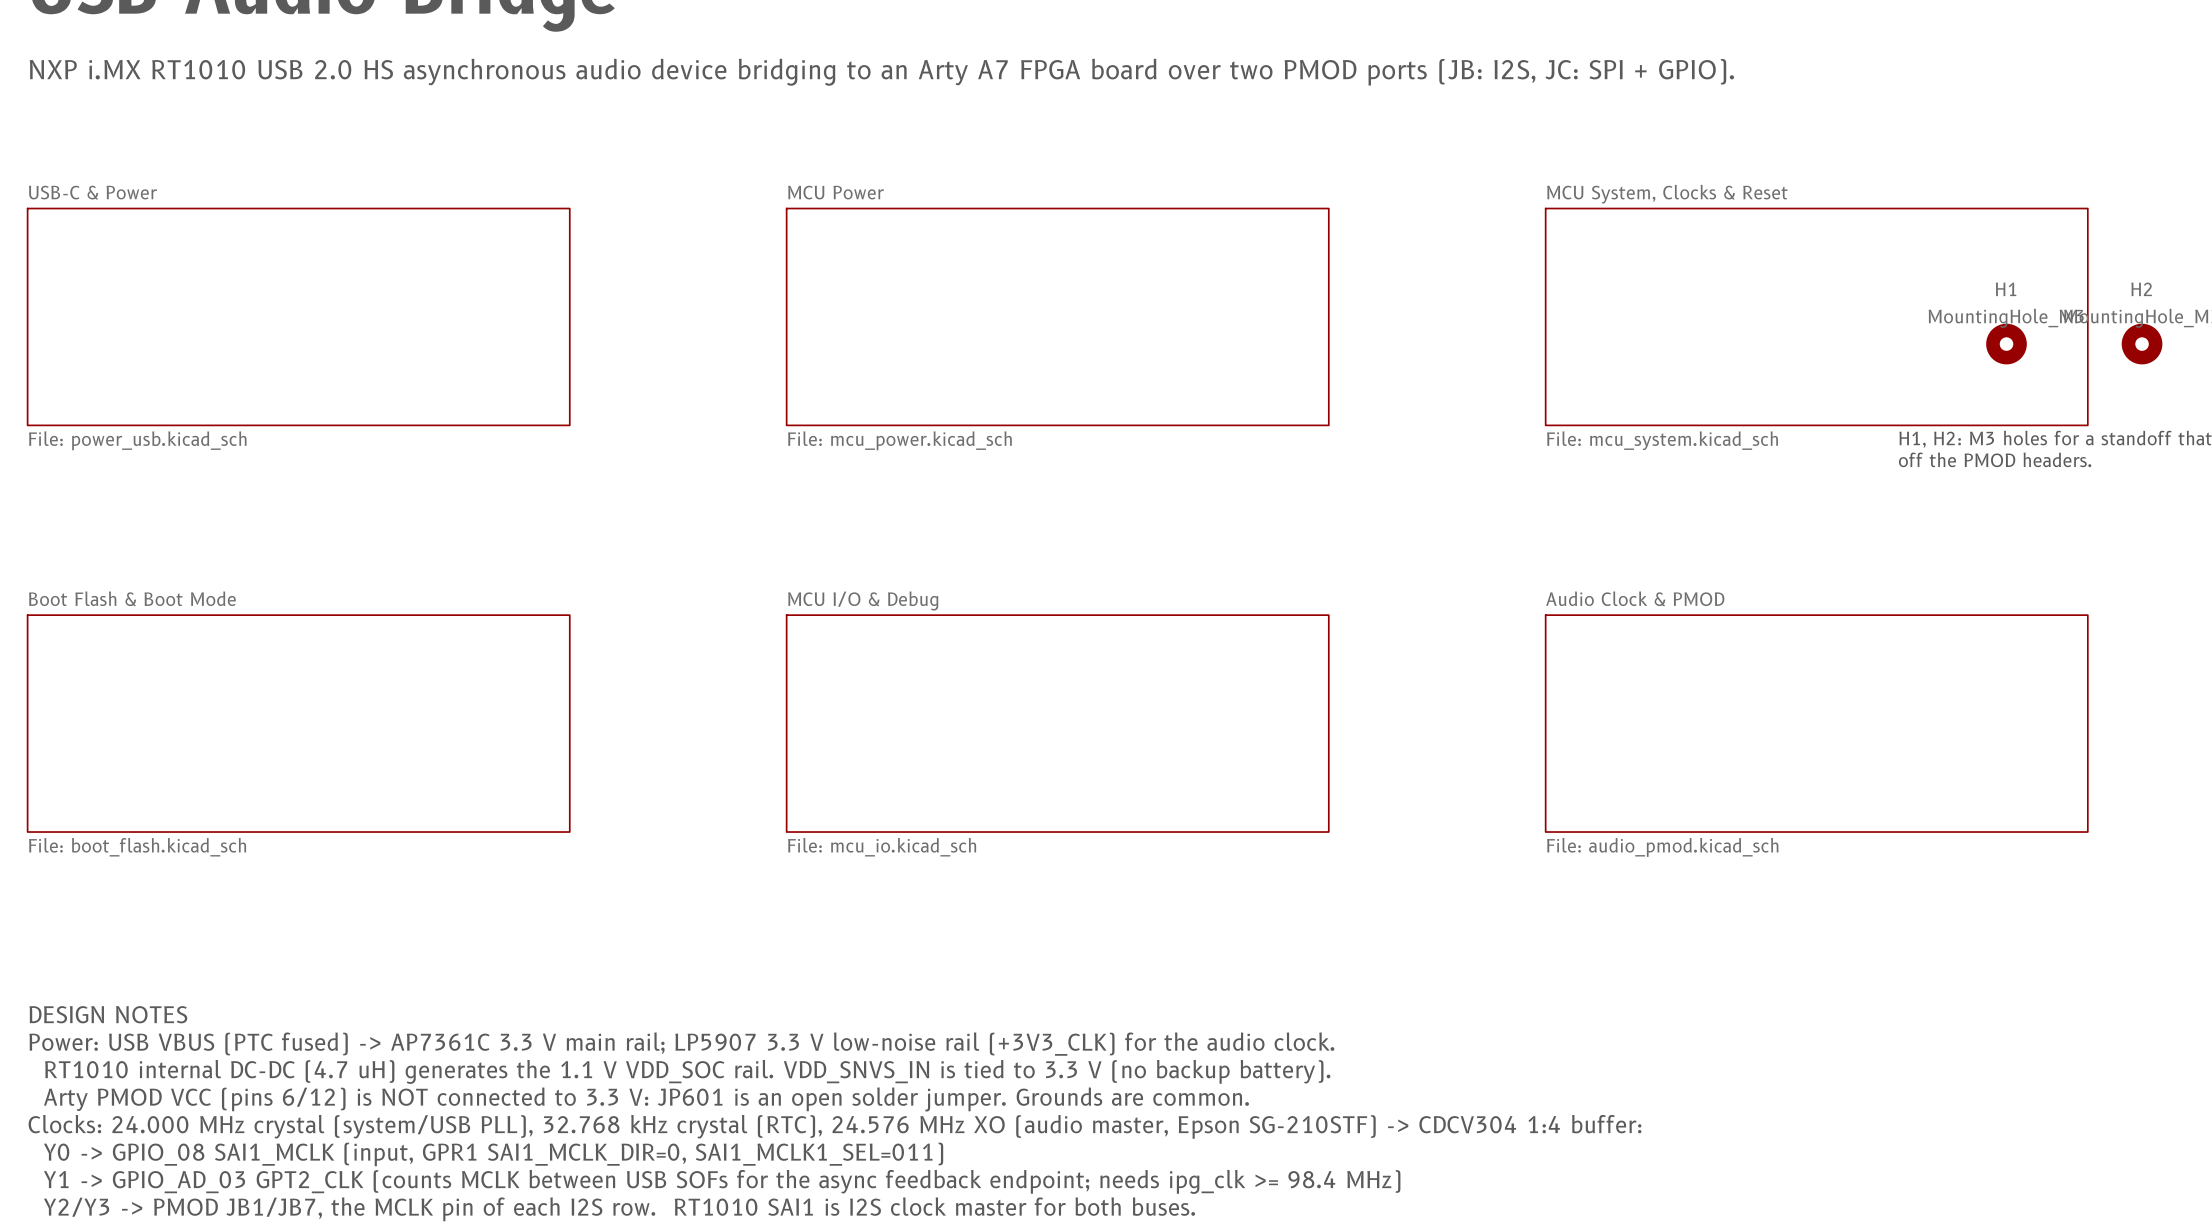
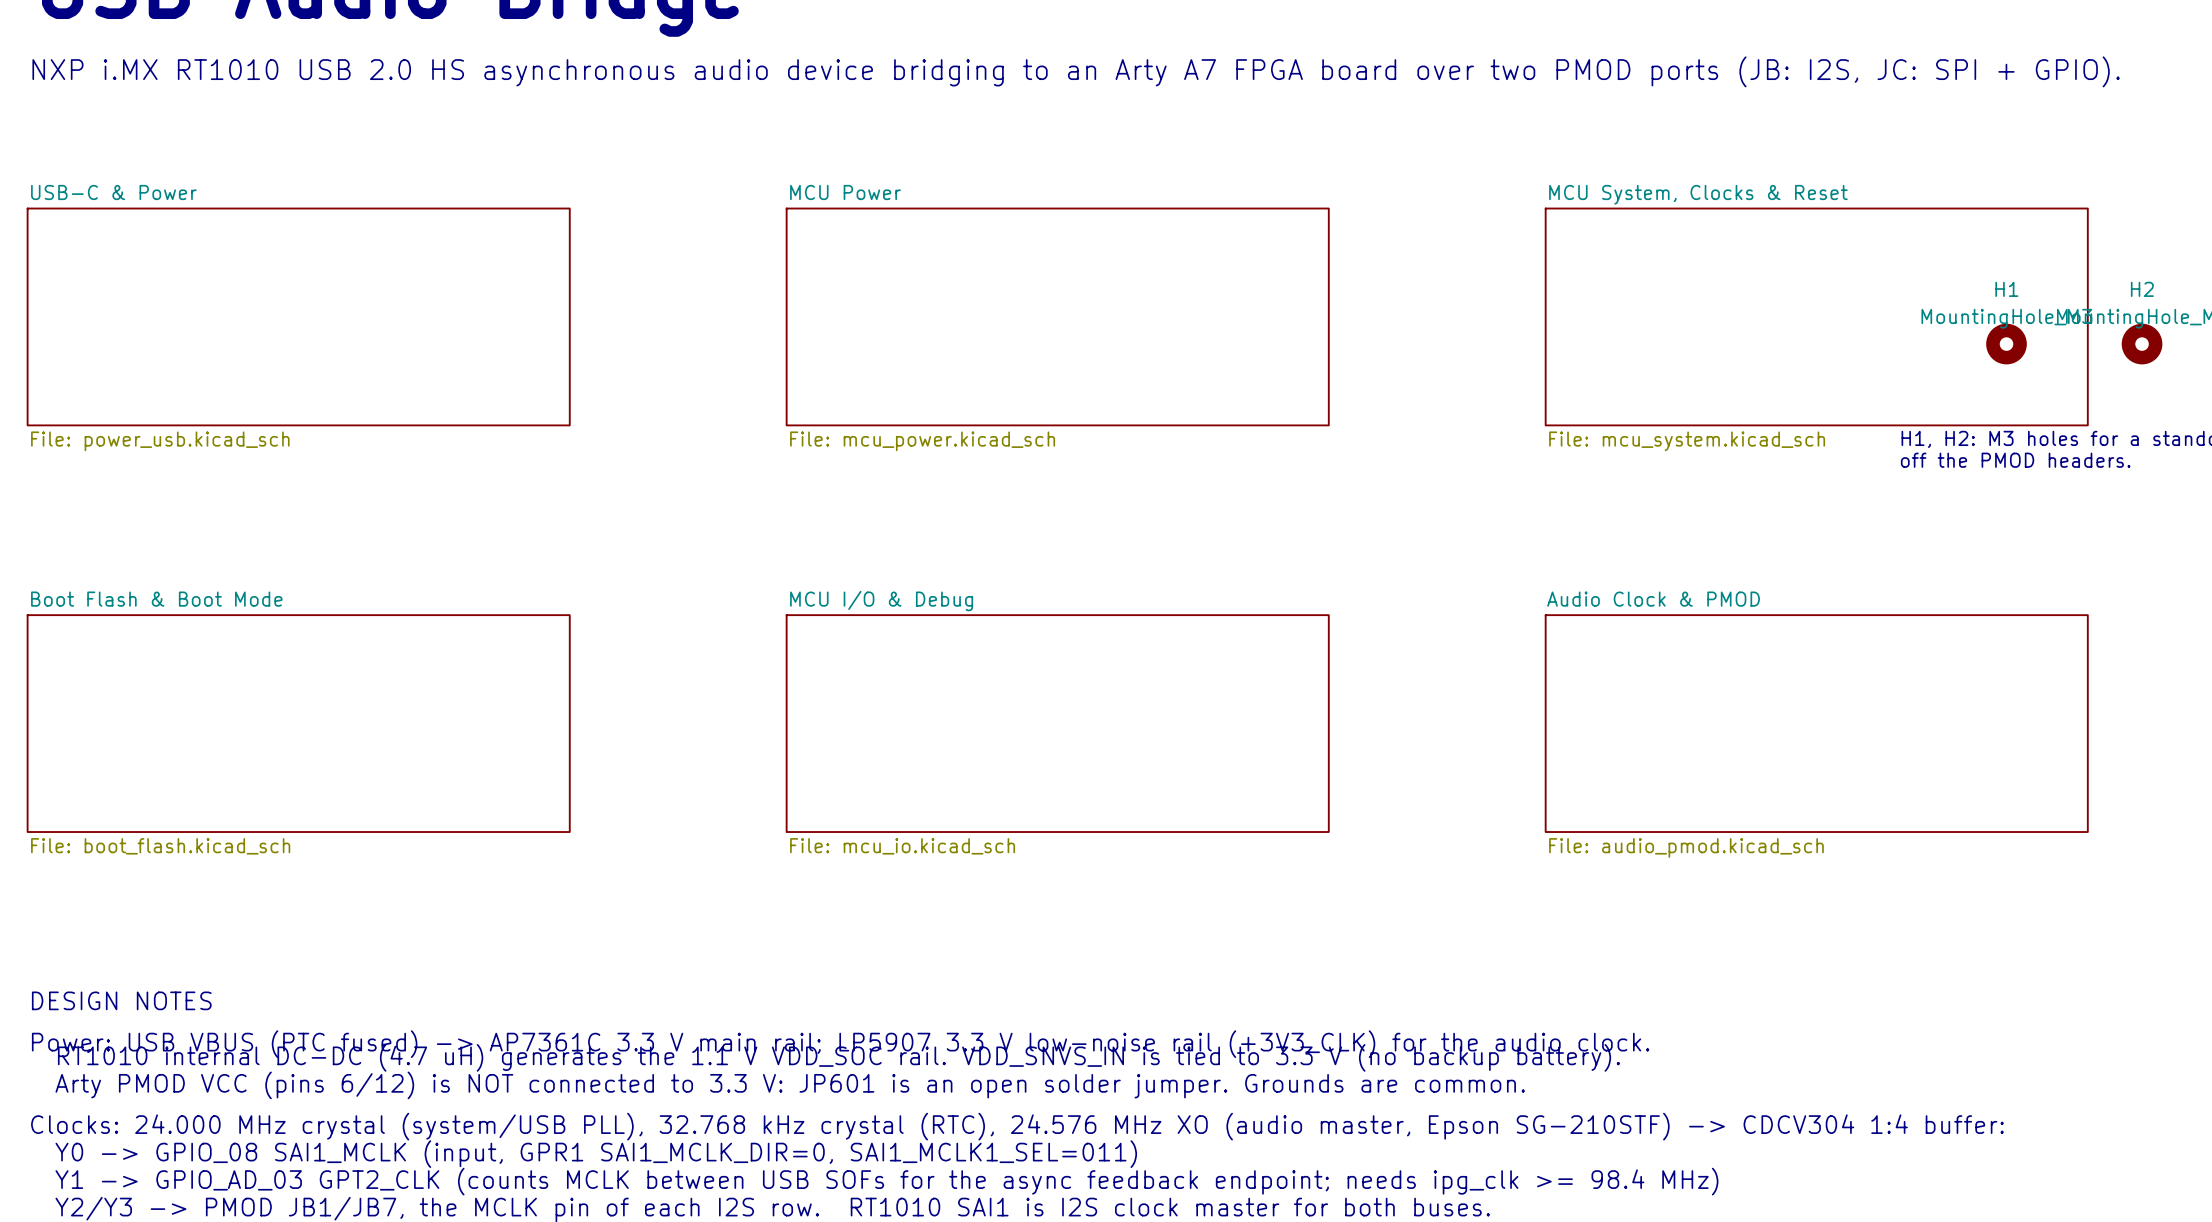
text position: DESIGN NOTES (108, 1014) -> DESIGN NOTES (121, 1000)
text position: RT1010 internal DC-DC (4.7 uH) generates the 1.1 V VDD_SOC rail. VDD_SNVS_IN is tied to 3.3 V (no backup battery). (687, 1071) -> RT1010 internal DC-DC (4.7 uH) generates the 1.1 V VDD_SOC rail. VDD_SNVS_IN is tied to 3.3 V (no backup battery). (838, 1057)
text position: Arty PMOD VCC (pins 6/12) is NOT connected to 3.3 V: JP601 is an open solder jumper. Grounds are common. (646, 1099) -> Arty PMOD VCC (pins 6/12) is NOT connected to 3.3 V: JP601 is an open solder jumper. Grounds are common. (790, 1085)

